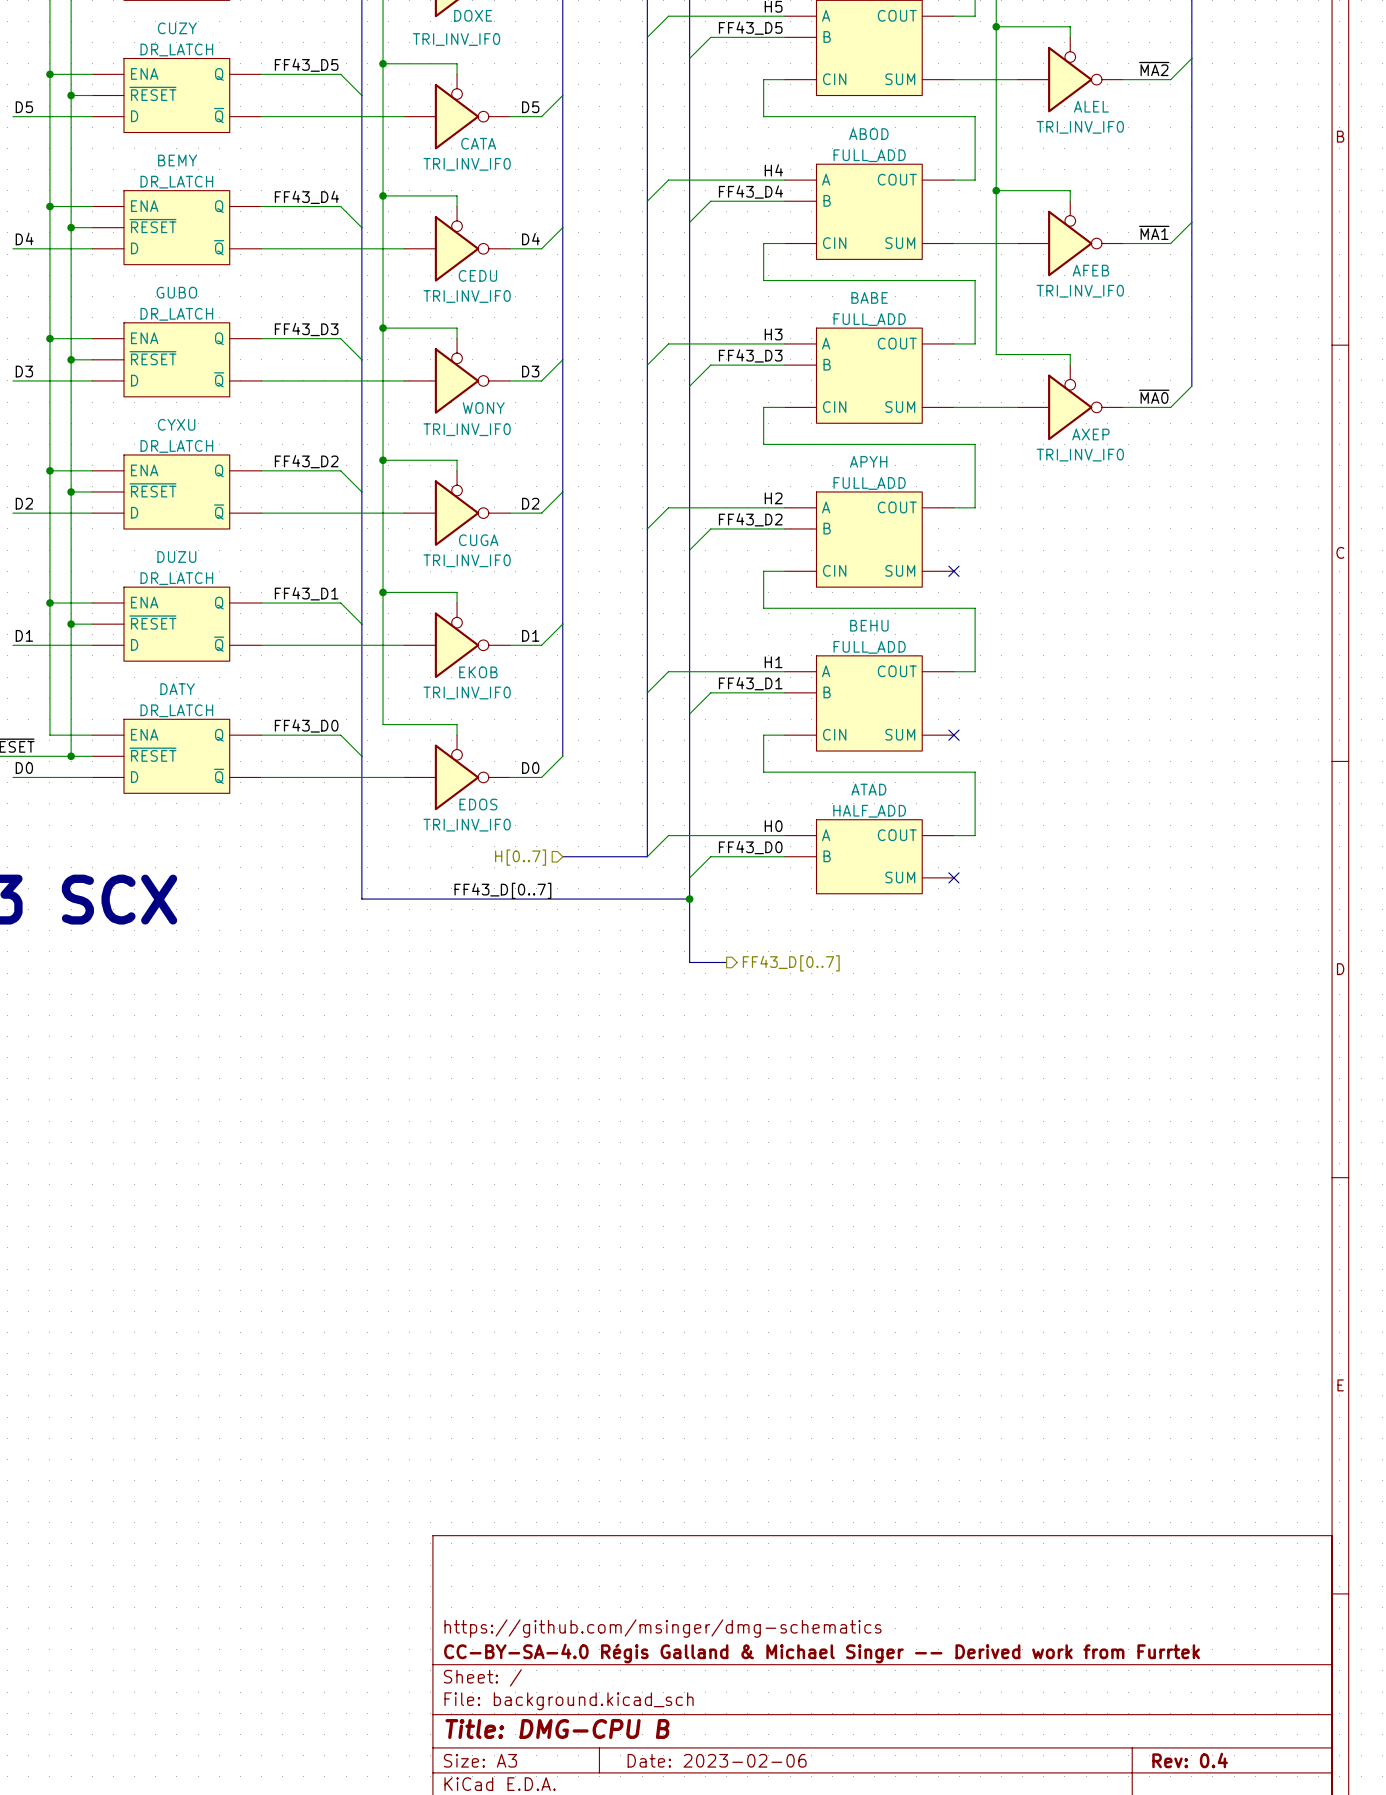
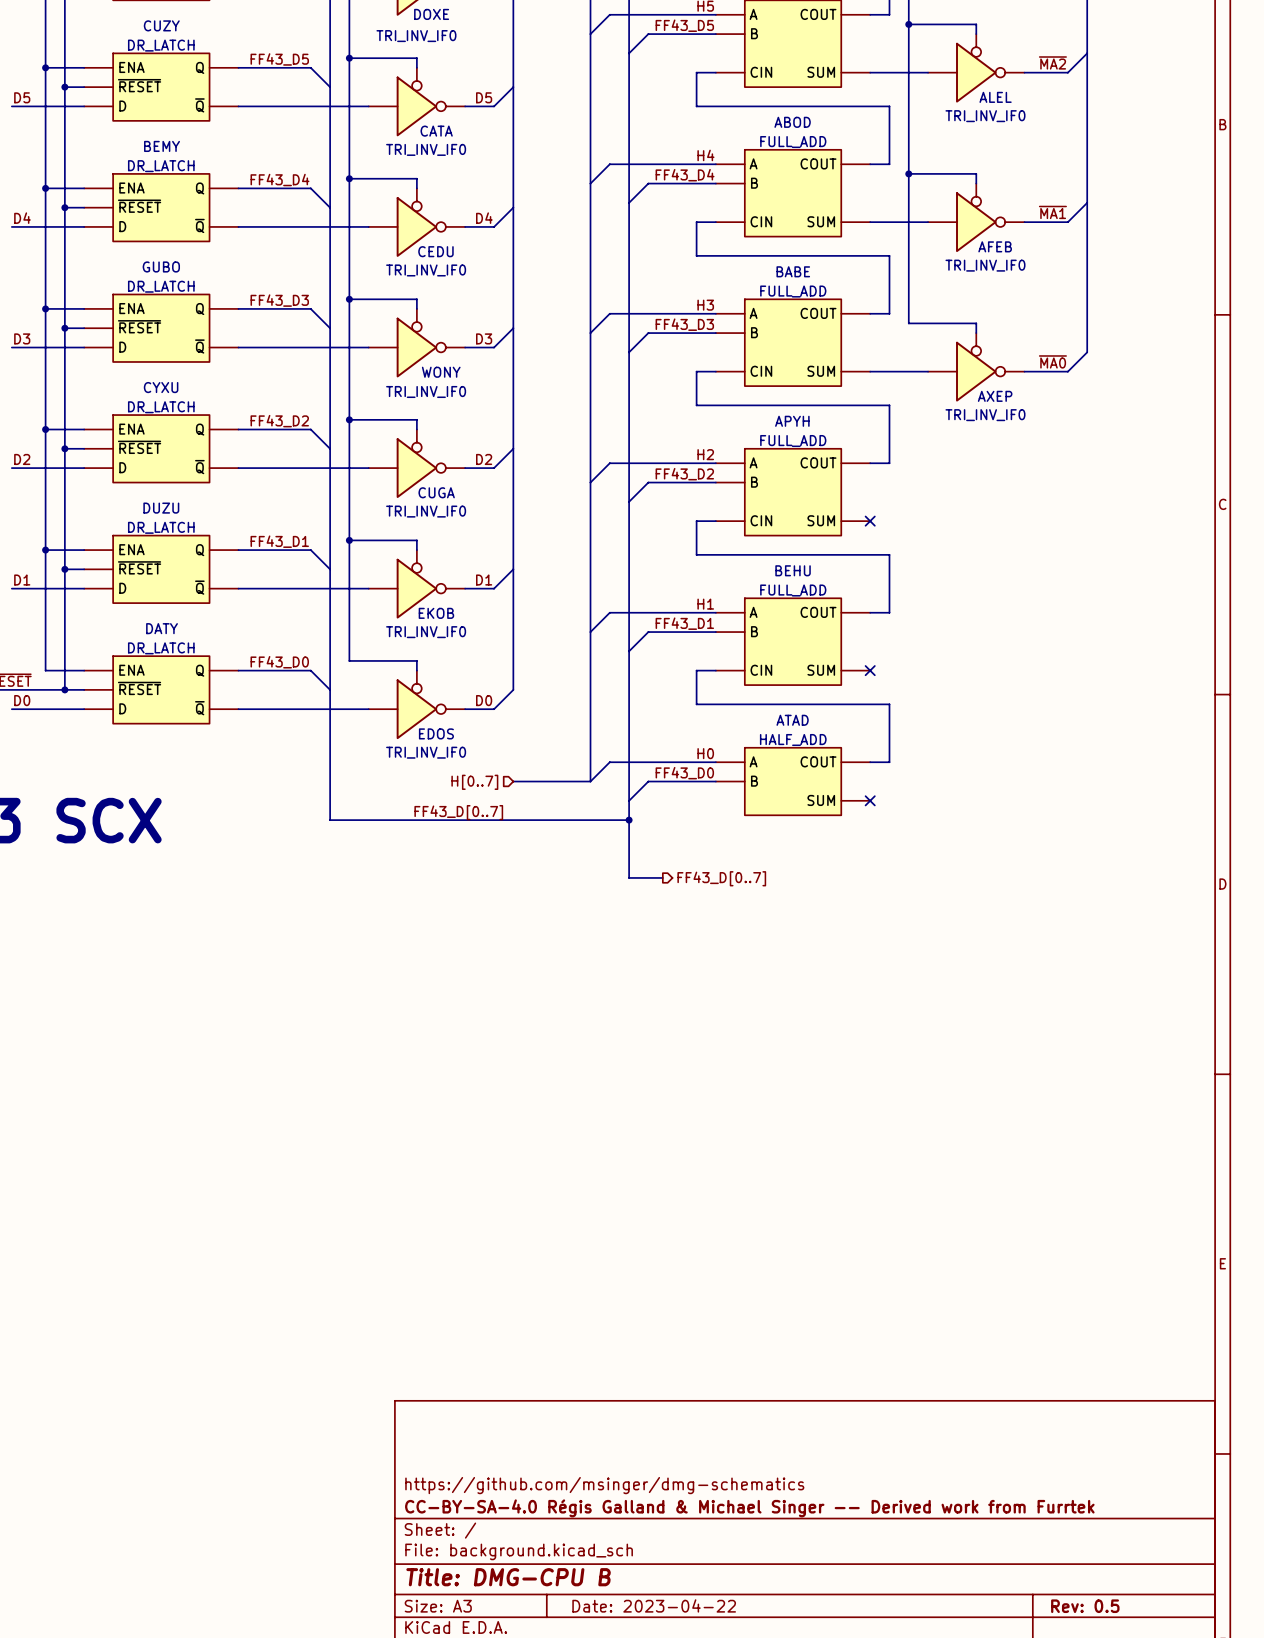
title block: Date: 2023-02-06 (717, 1760) -> Date: 2023-04-22 (654, 1605)
title block: Rev: 0.4 (1190, 1760) -> Rev: 0.5 (1085, 1606)

